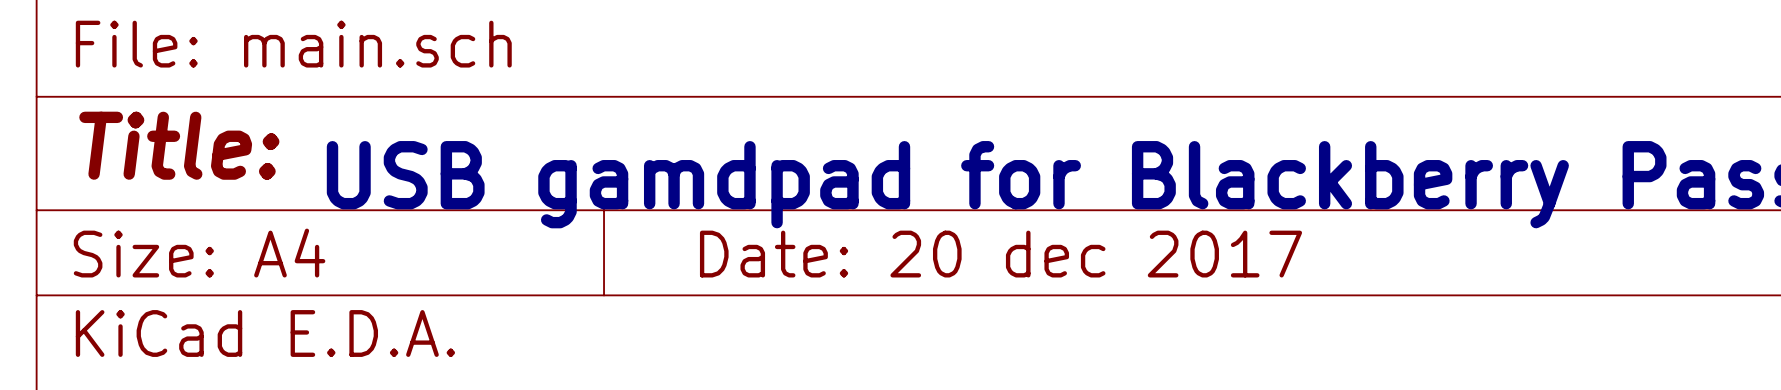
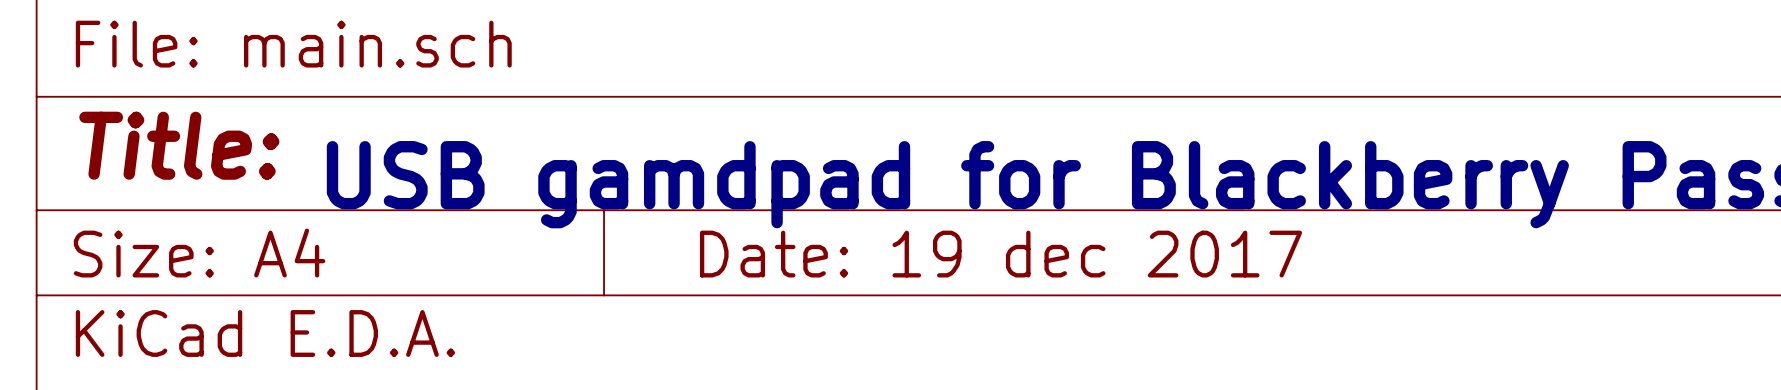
title block: Date: 20 dec 2017 (1001, 254) -> Date: 19 dec 2017 (1001, 254)

